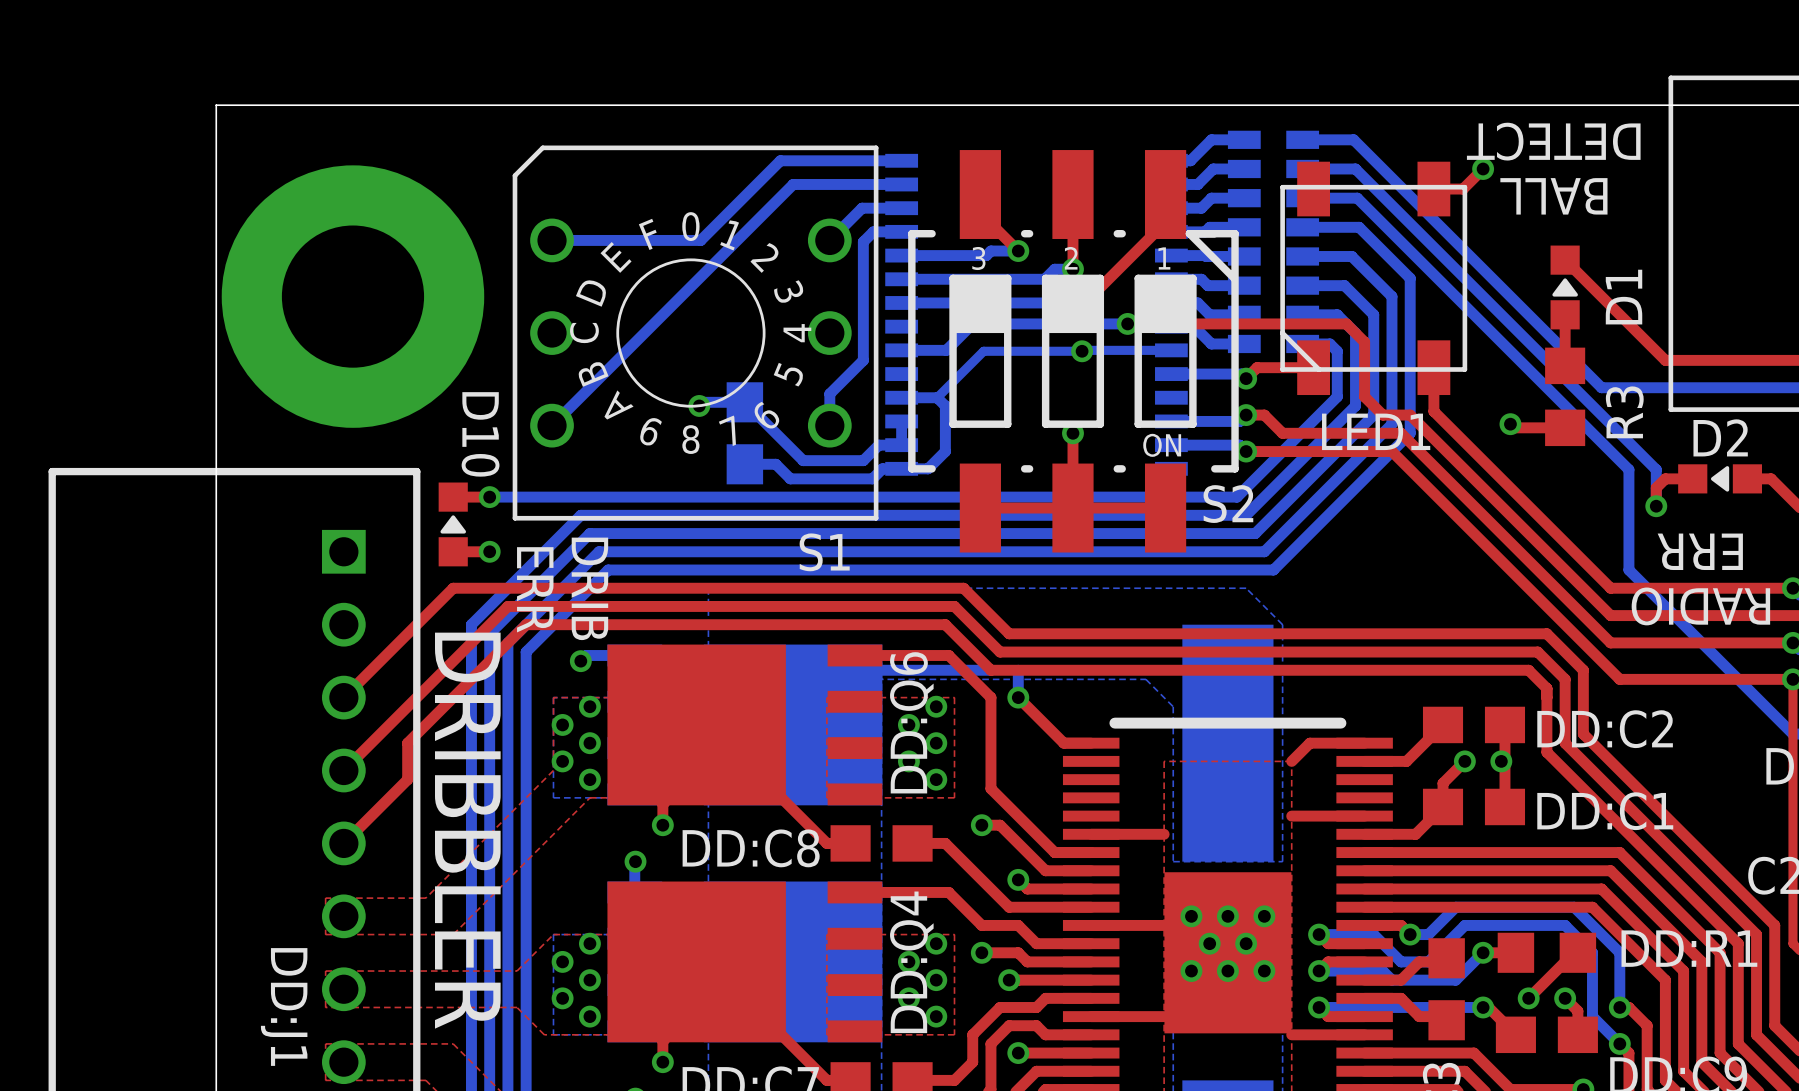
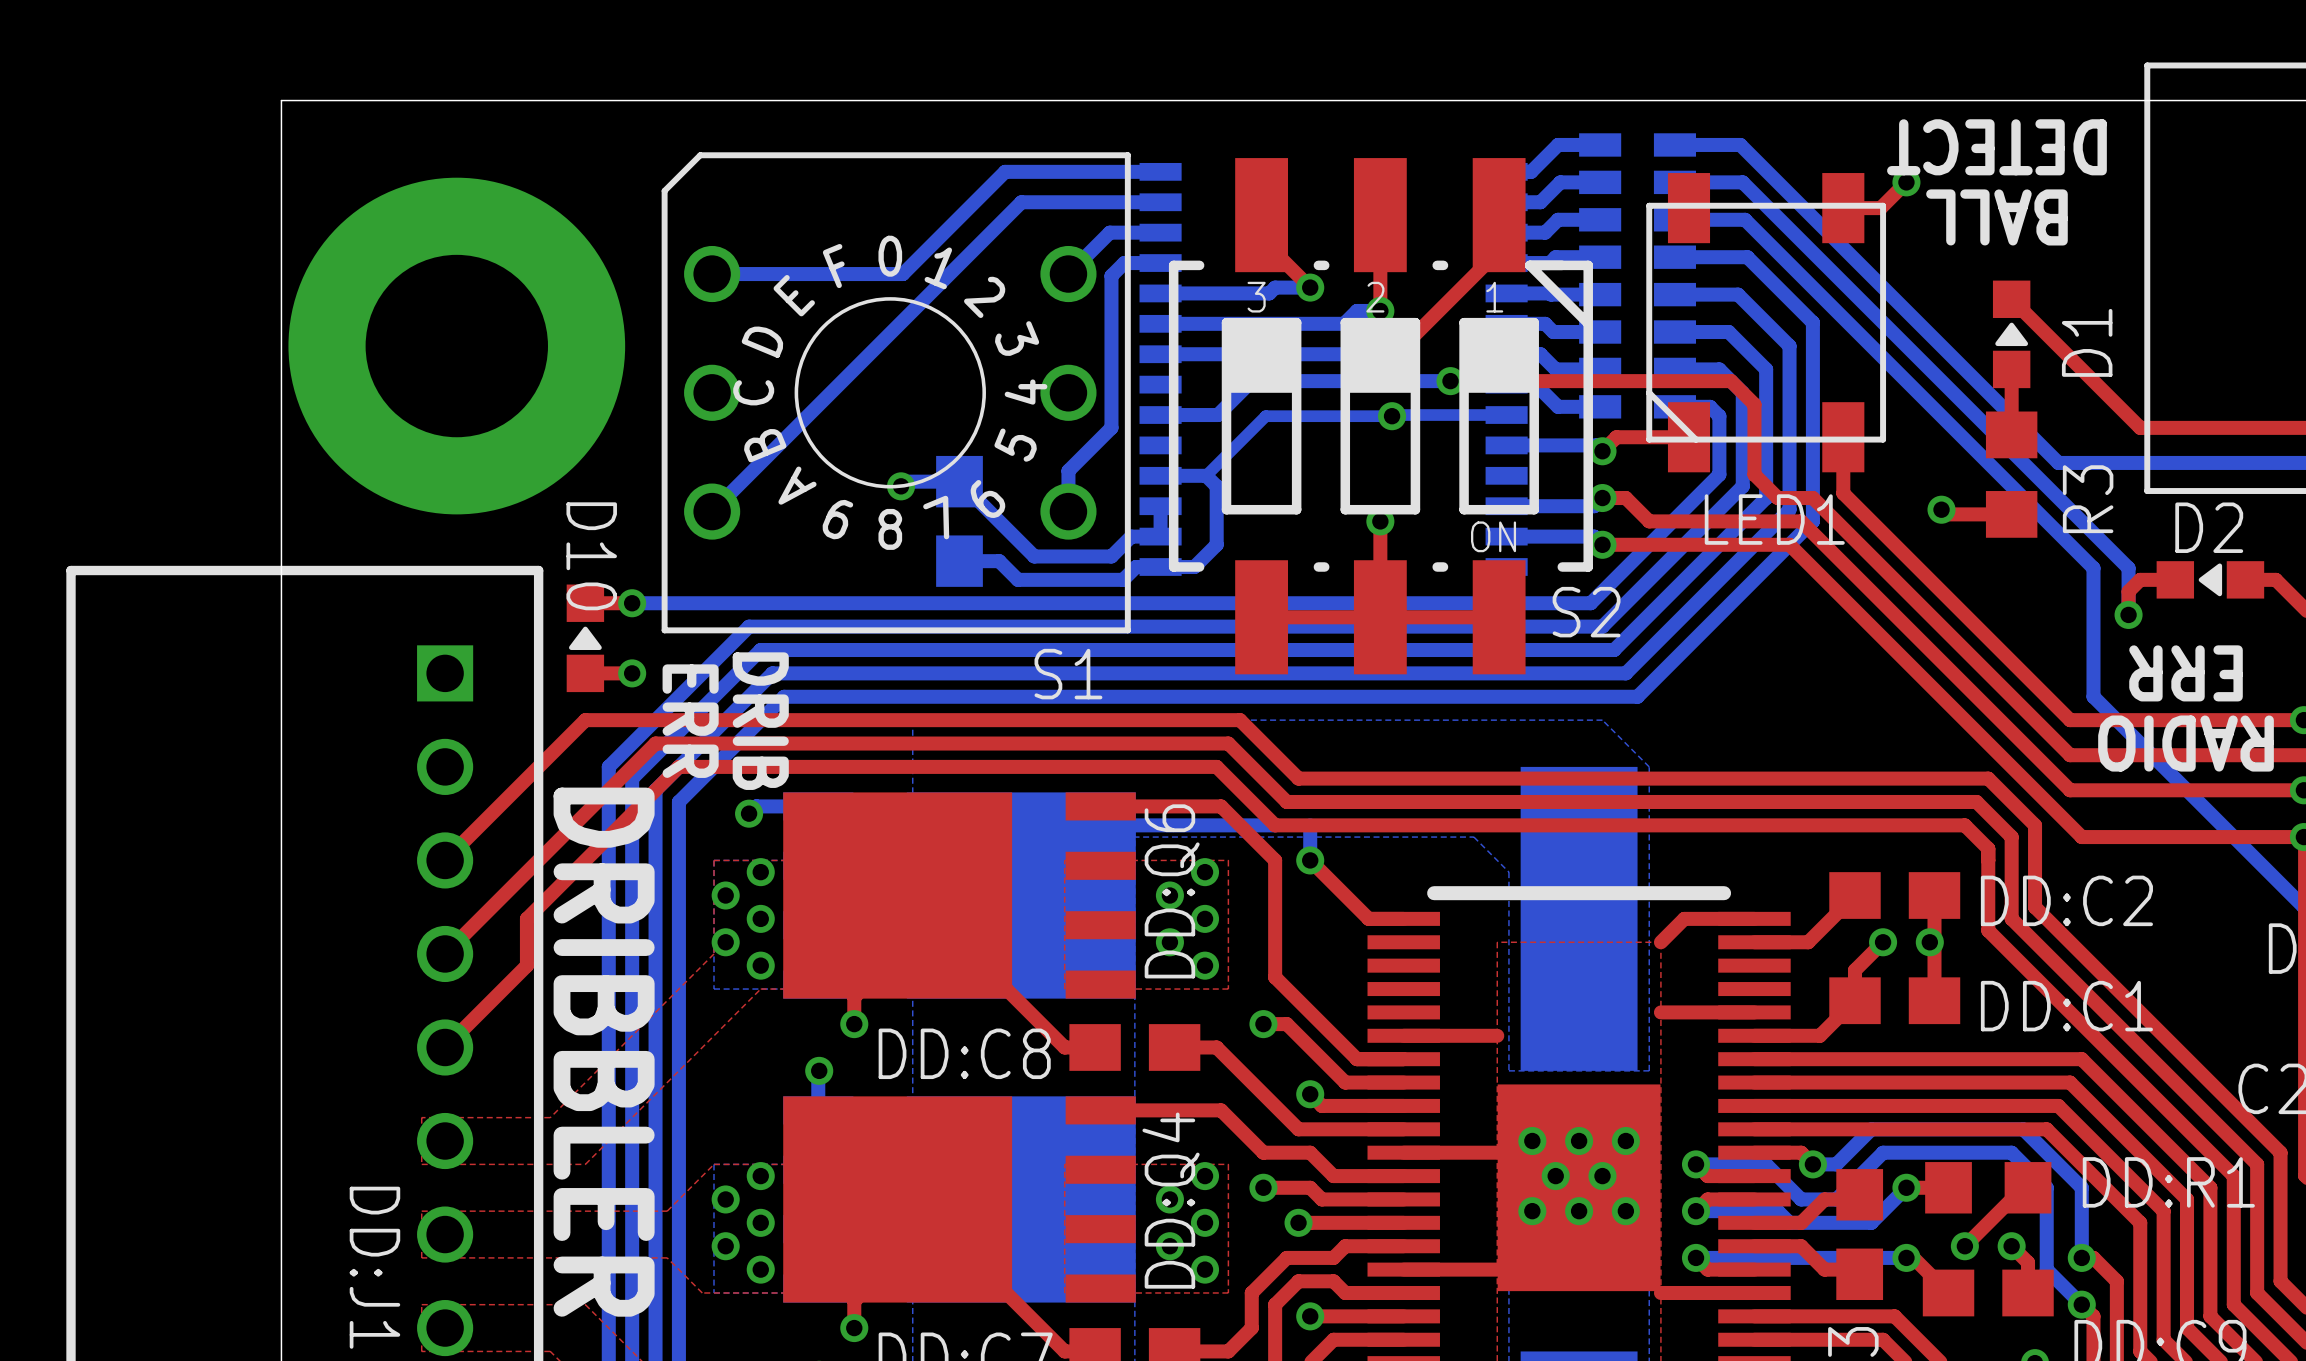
D10 name position: D10 (480, 434) -> D10 (591, 556)

